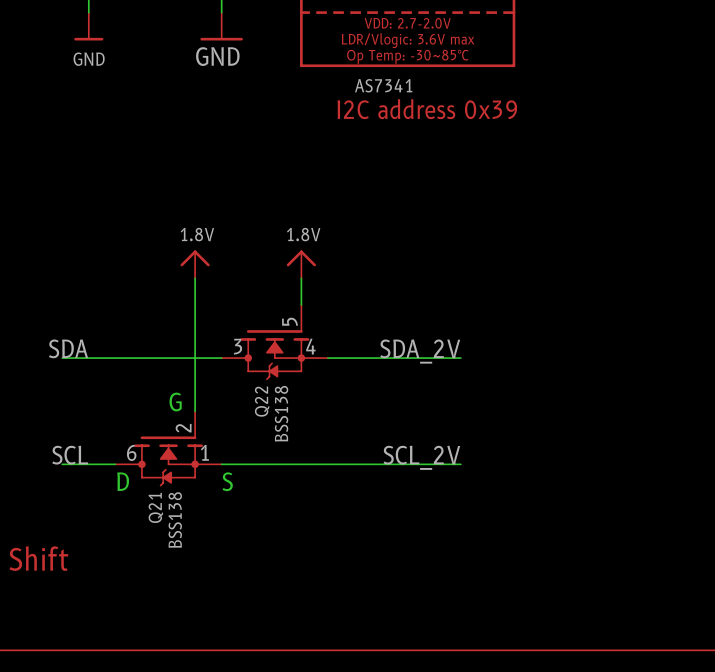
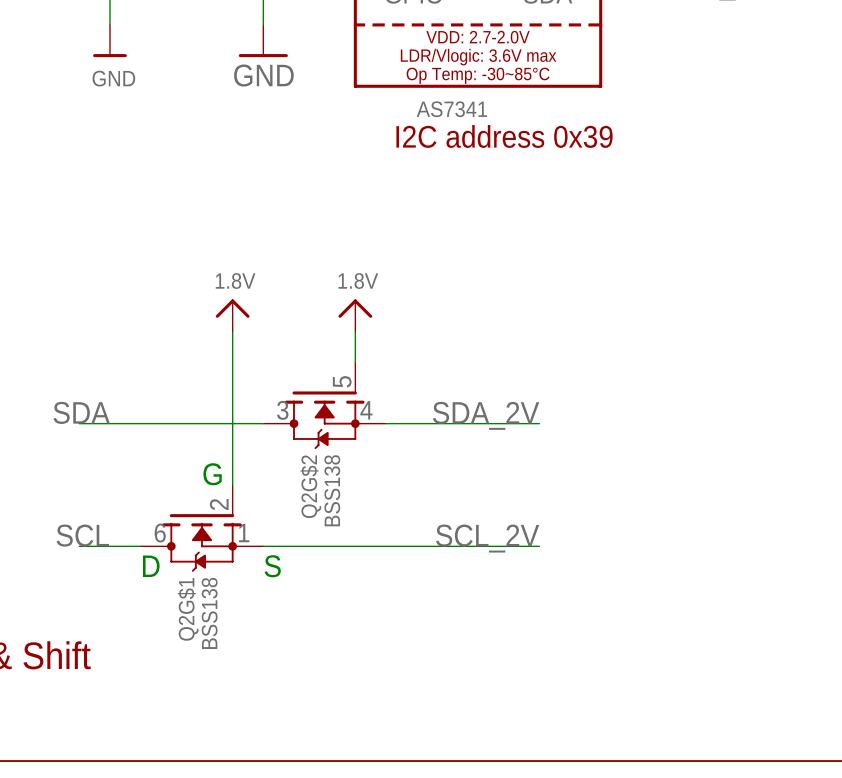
Q22 name: Q22 (262, 401) -> Q2G$2 (310, 486)
Q21 name: Q21 (155, 507) -> Q2G$1 (188, 609)

